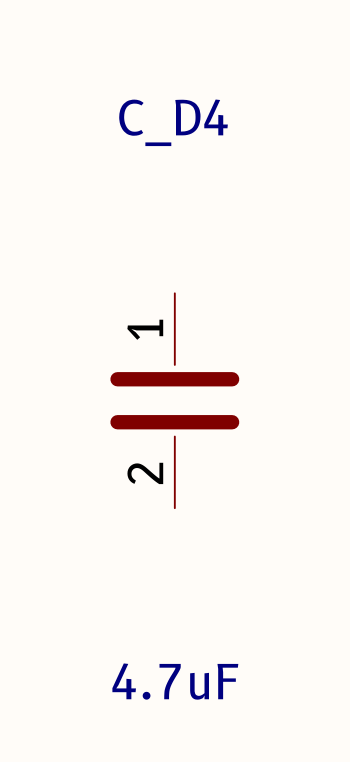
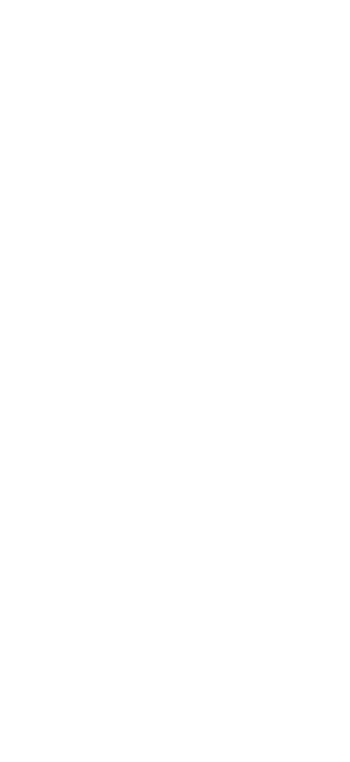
C_D4: 4.7uF (174, 400) -> none

